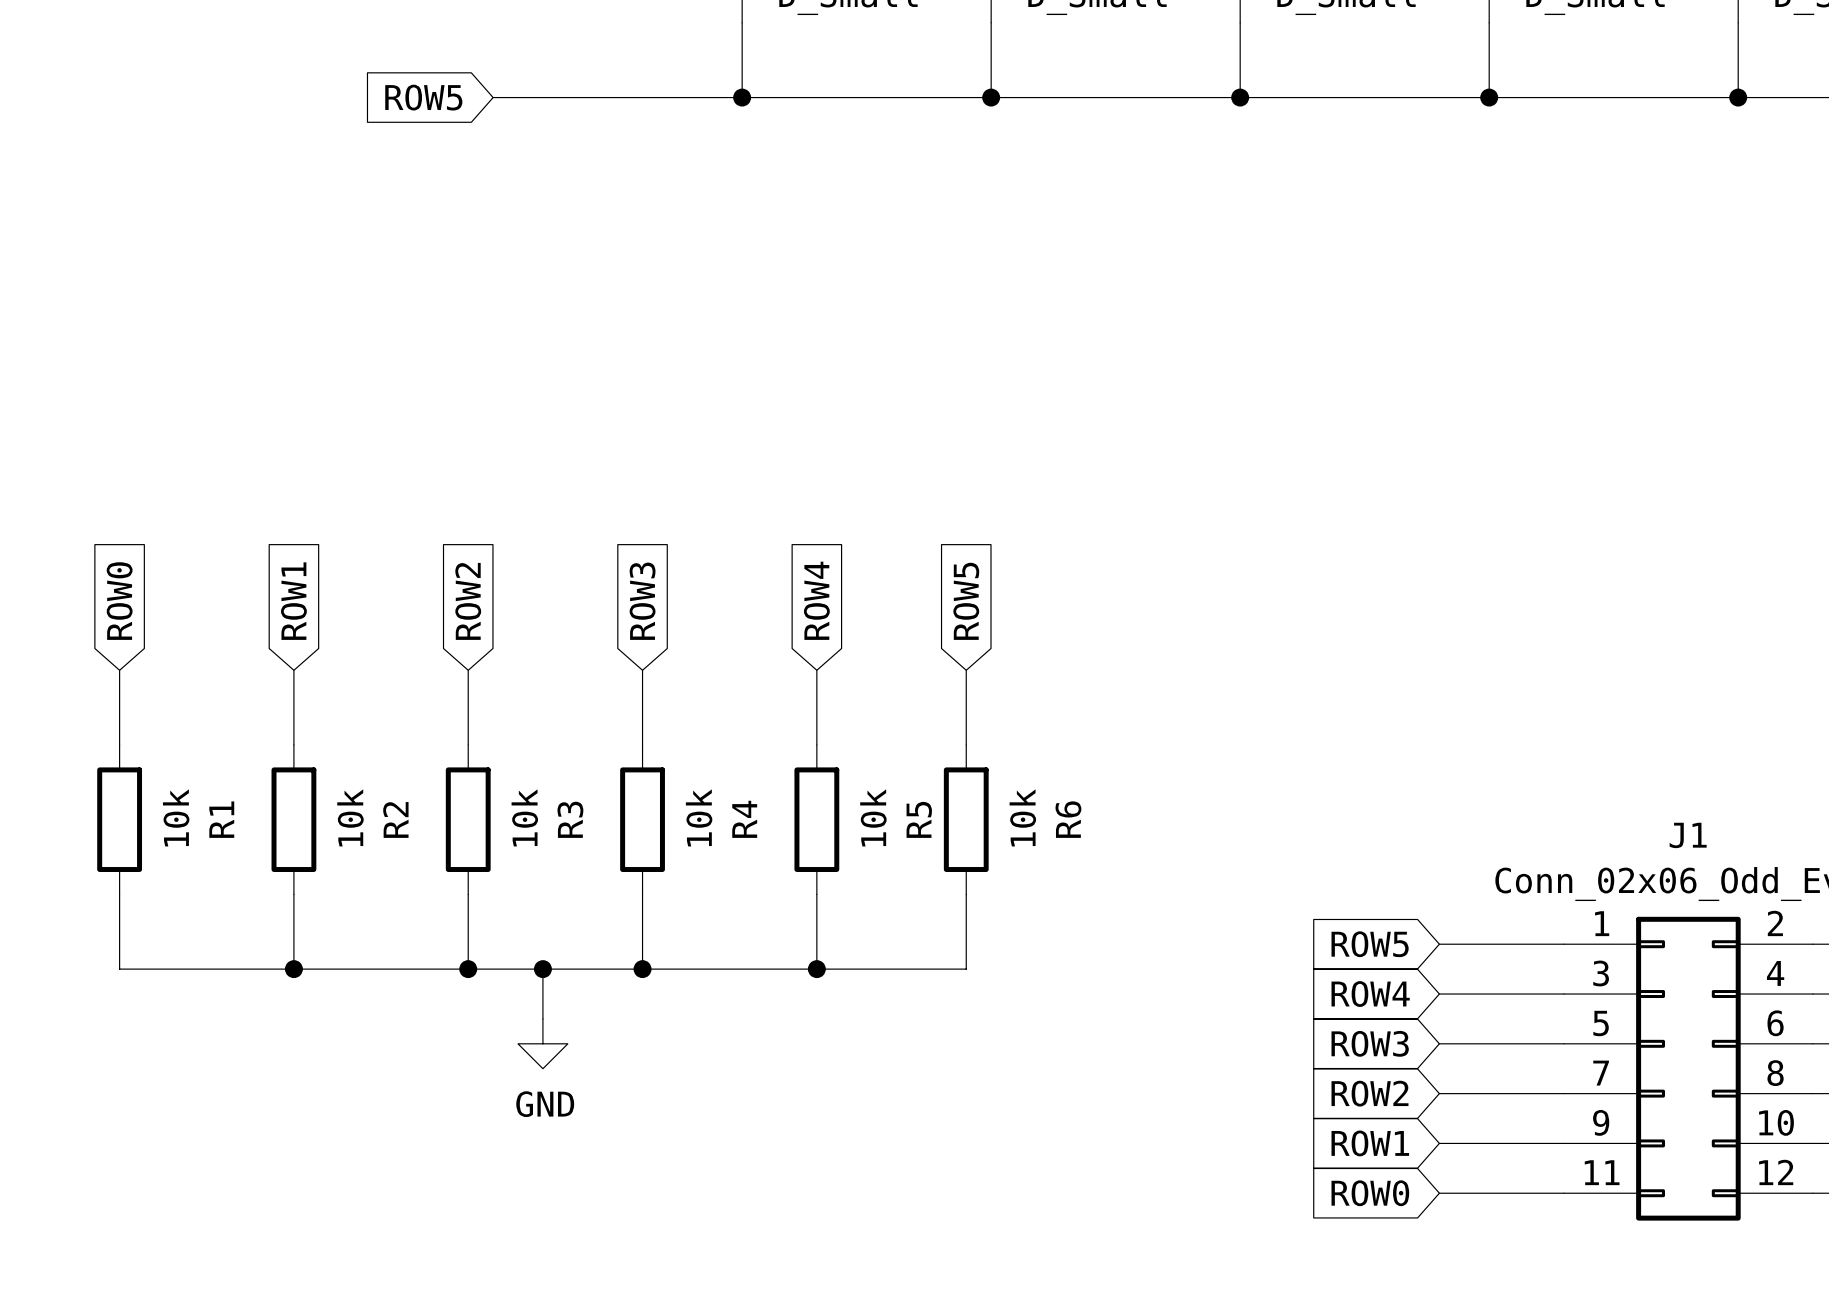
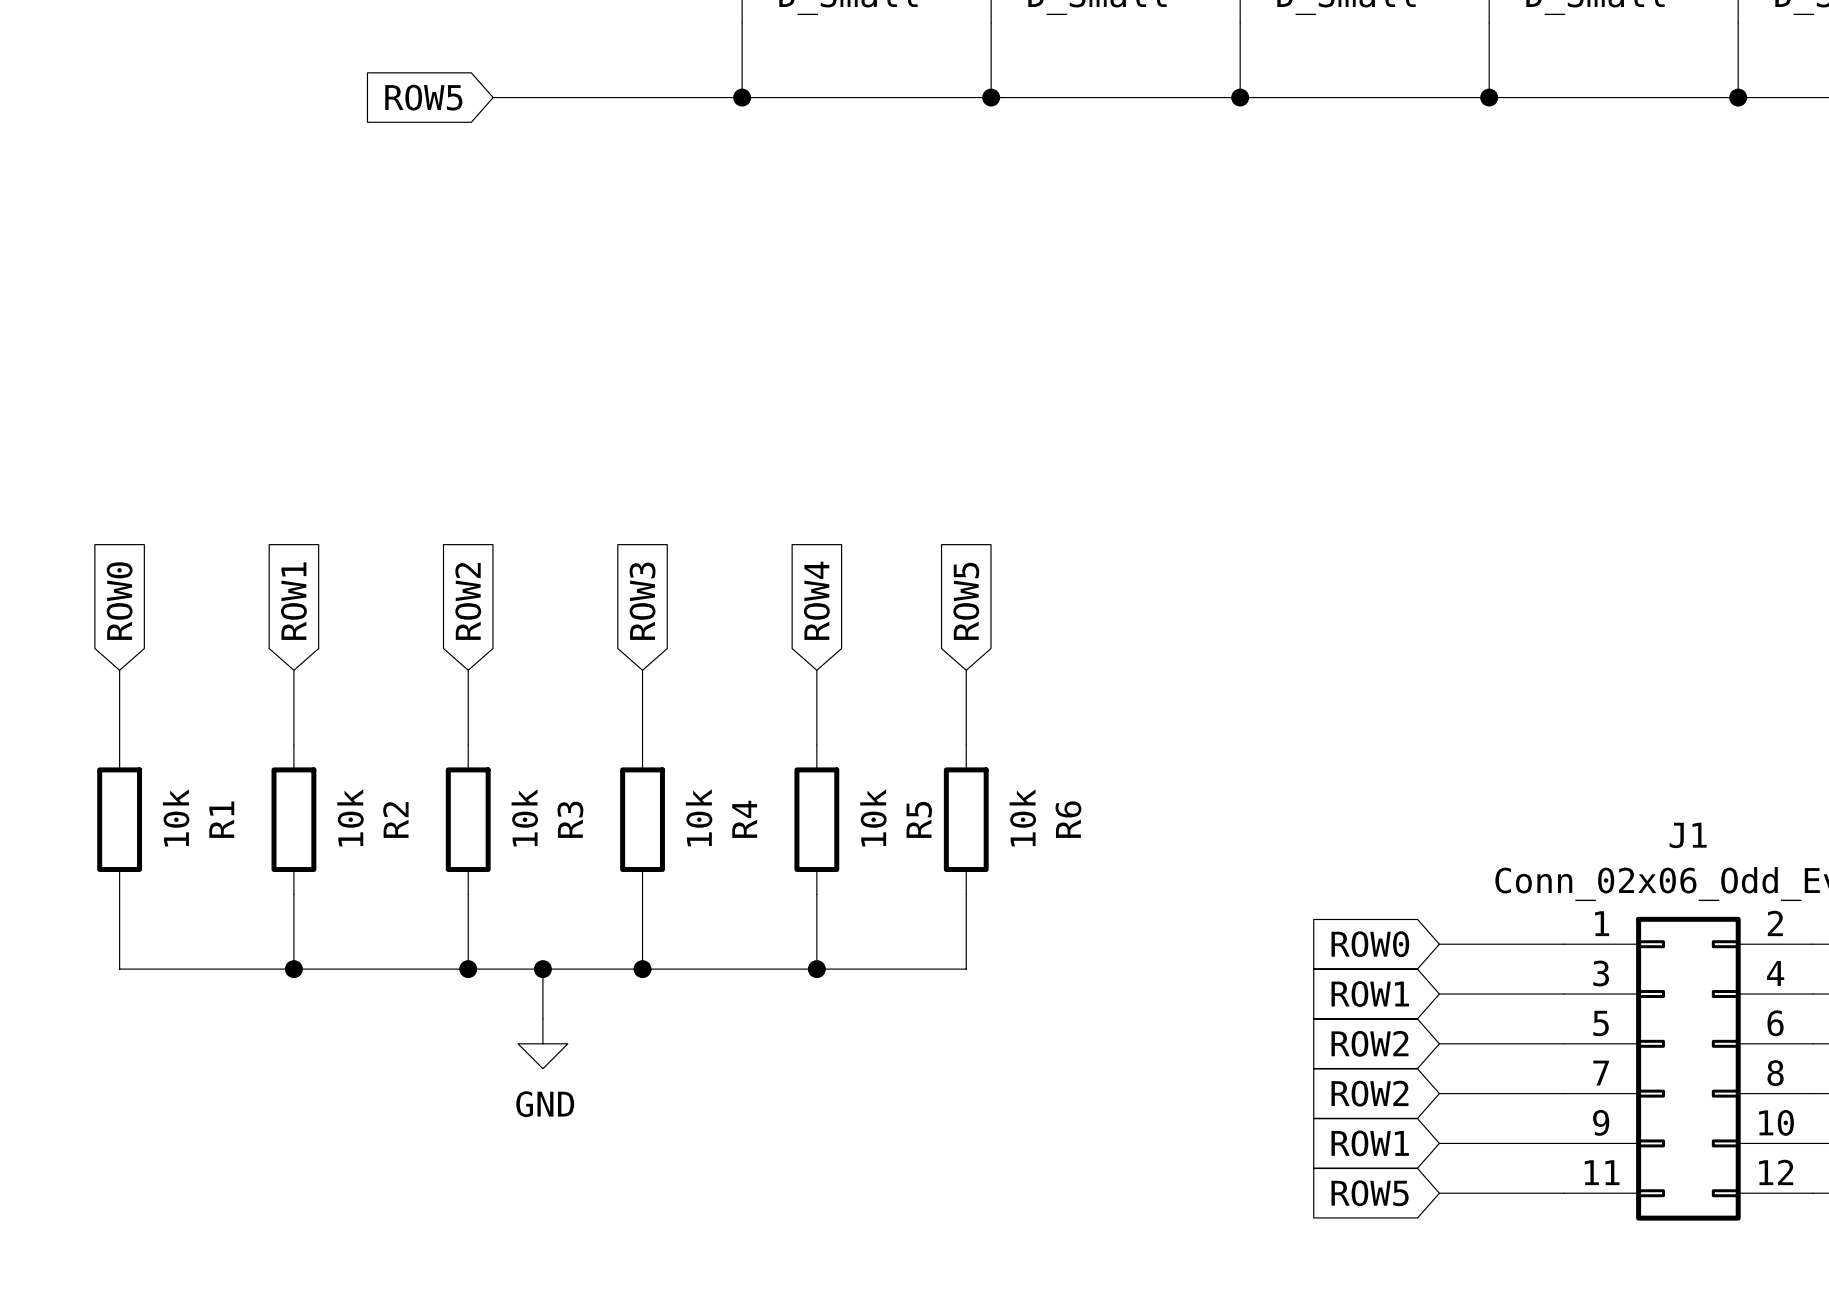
global label: ROW5 (1370, 944) -> ROW0 (1370, 944)
global label: ROW4 (1370, 994) -> ROW1 (1370, 994)
global label: ROW3 (1370, 1043) -> ROW2 (1369, 1043)
global label: ROW0 (1370, 1193) -> ROW5 (1370, 1193)

